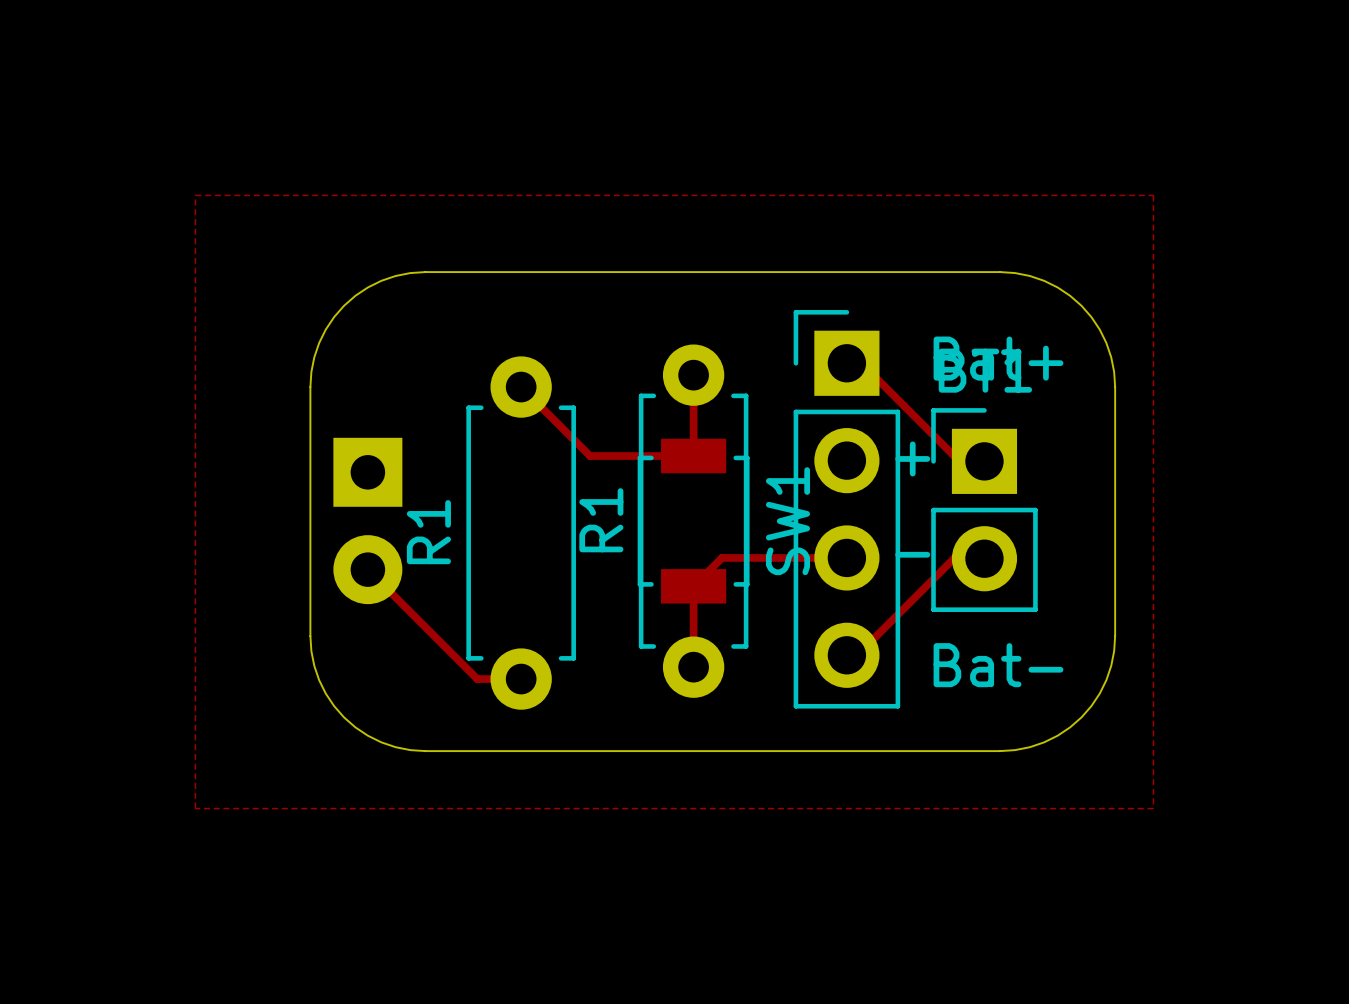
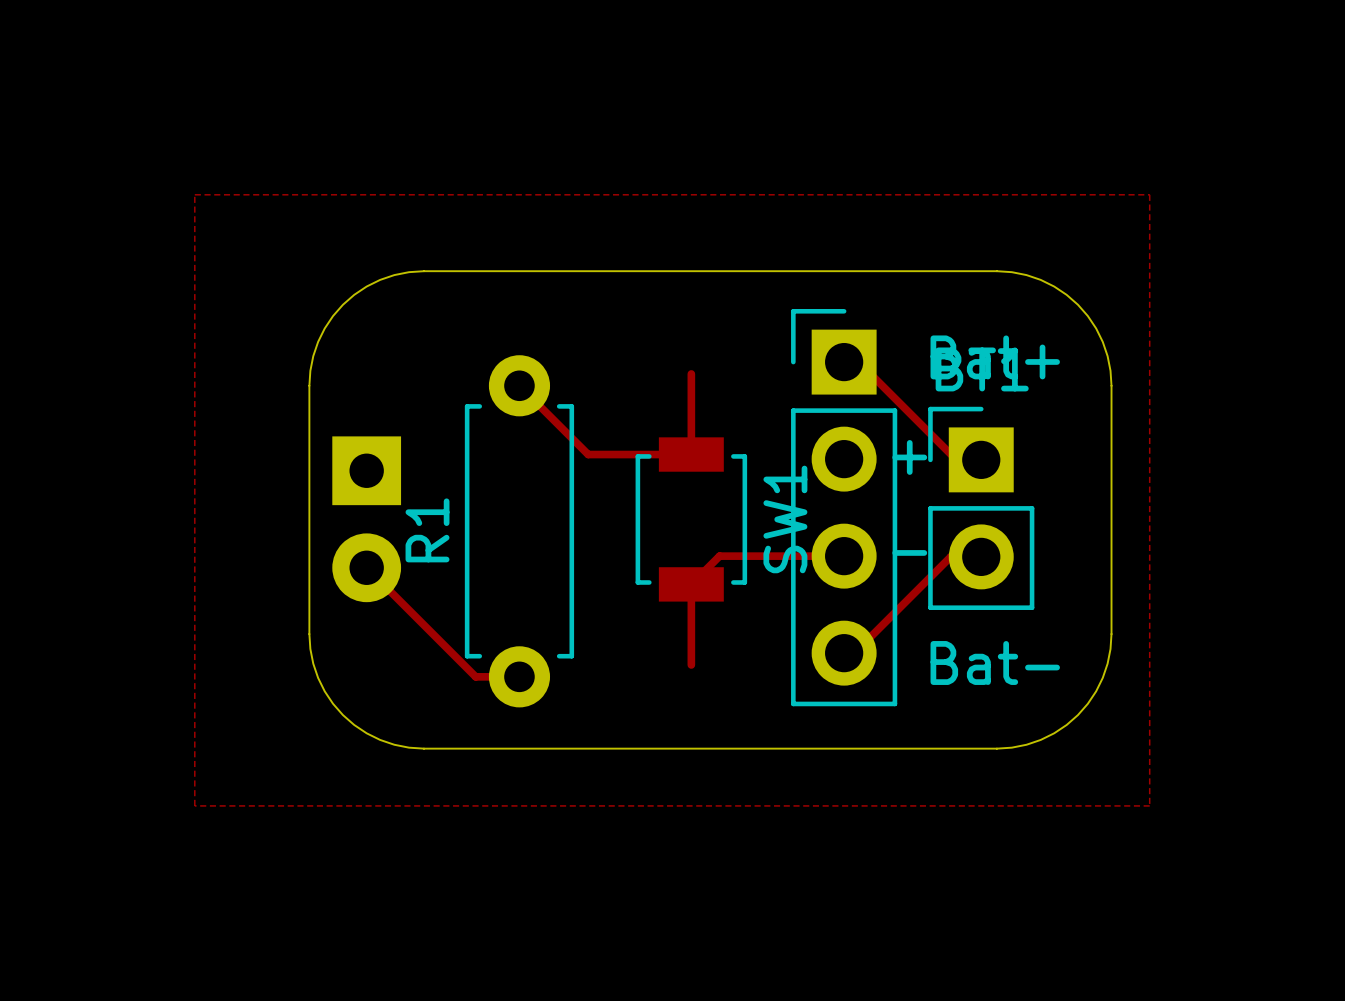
R1: (693, 521) -> none

